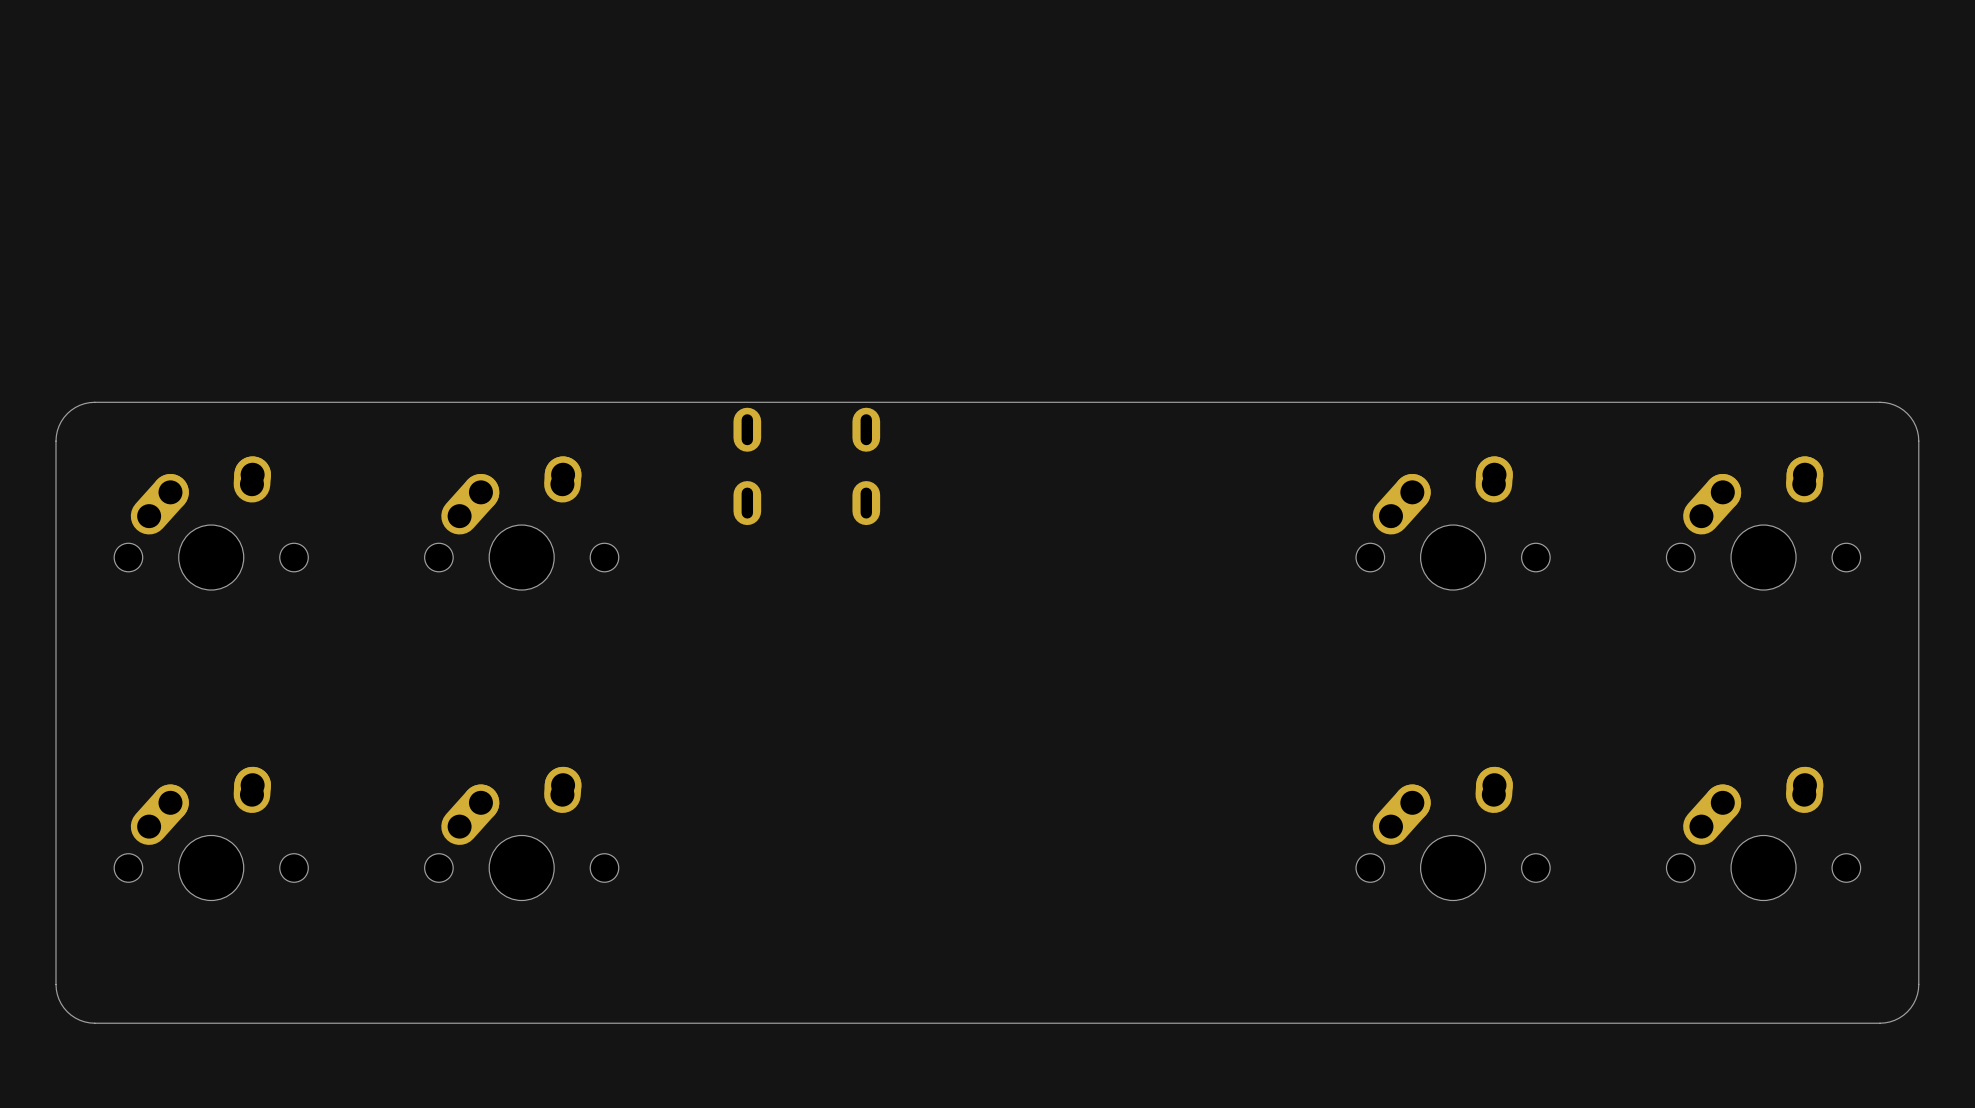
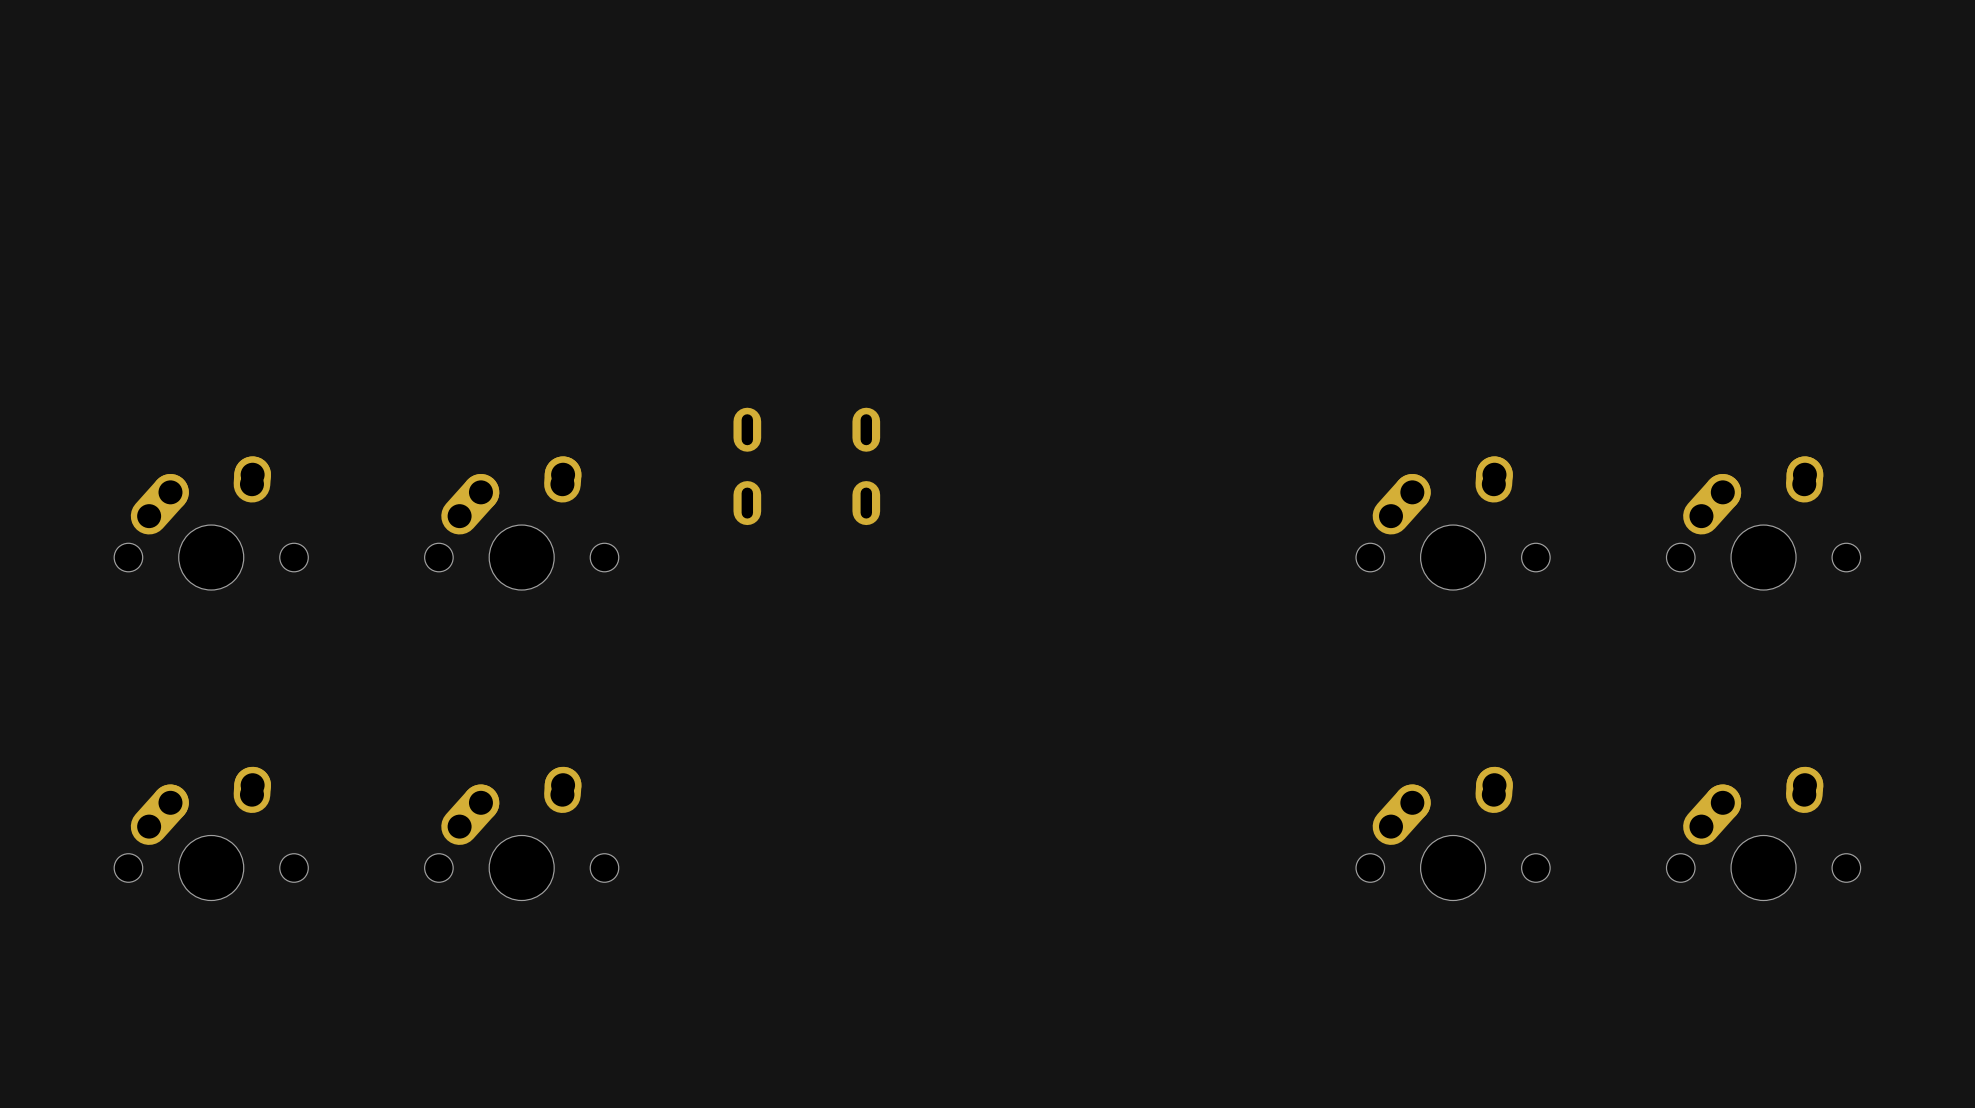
board edge: (94, 402) (1890, 403) (1899, 407) (1910, 417) (1917, 431) (1918, 441) (1917, 994) (1910, 1008) (1903, 1015) (1894, 1020) (1879, 1023) (84, 1021) (75, 1018) (64, 1008) (57, 994) (55, 984) (55, 441) (58, 426) (67, 413) (79, 405) (94, 402) -> none

